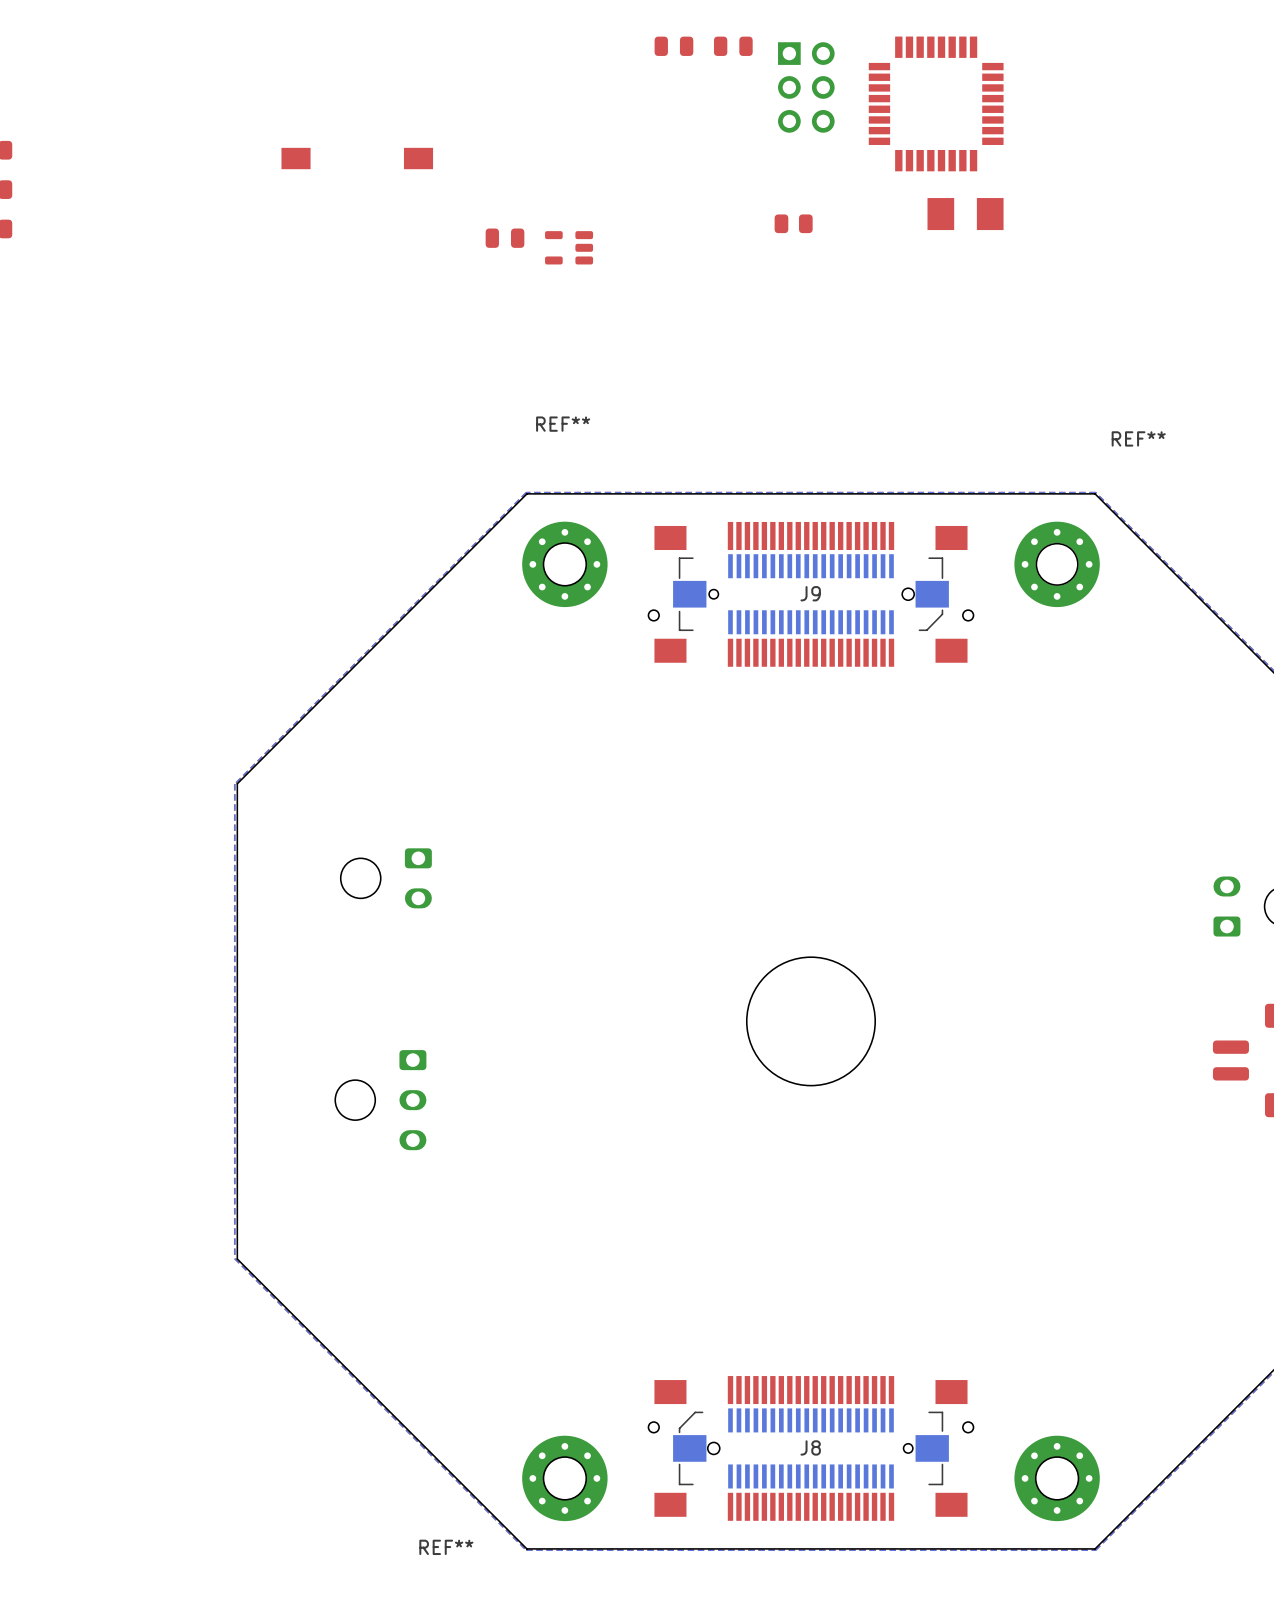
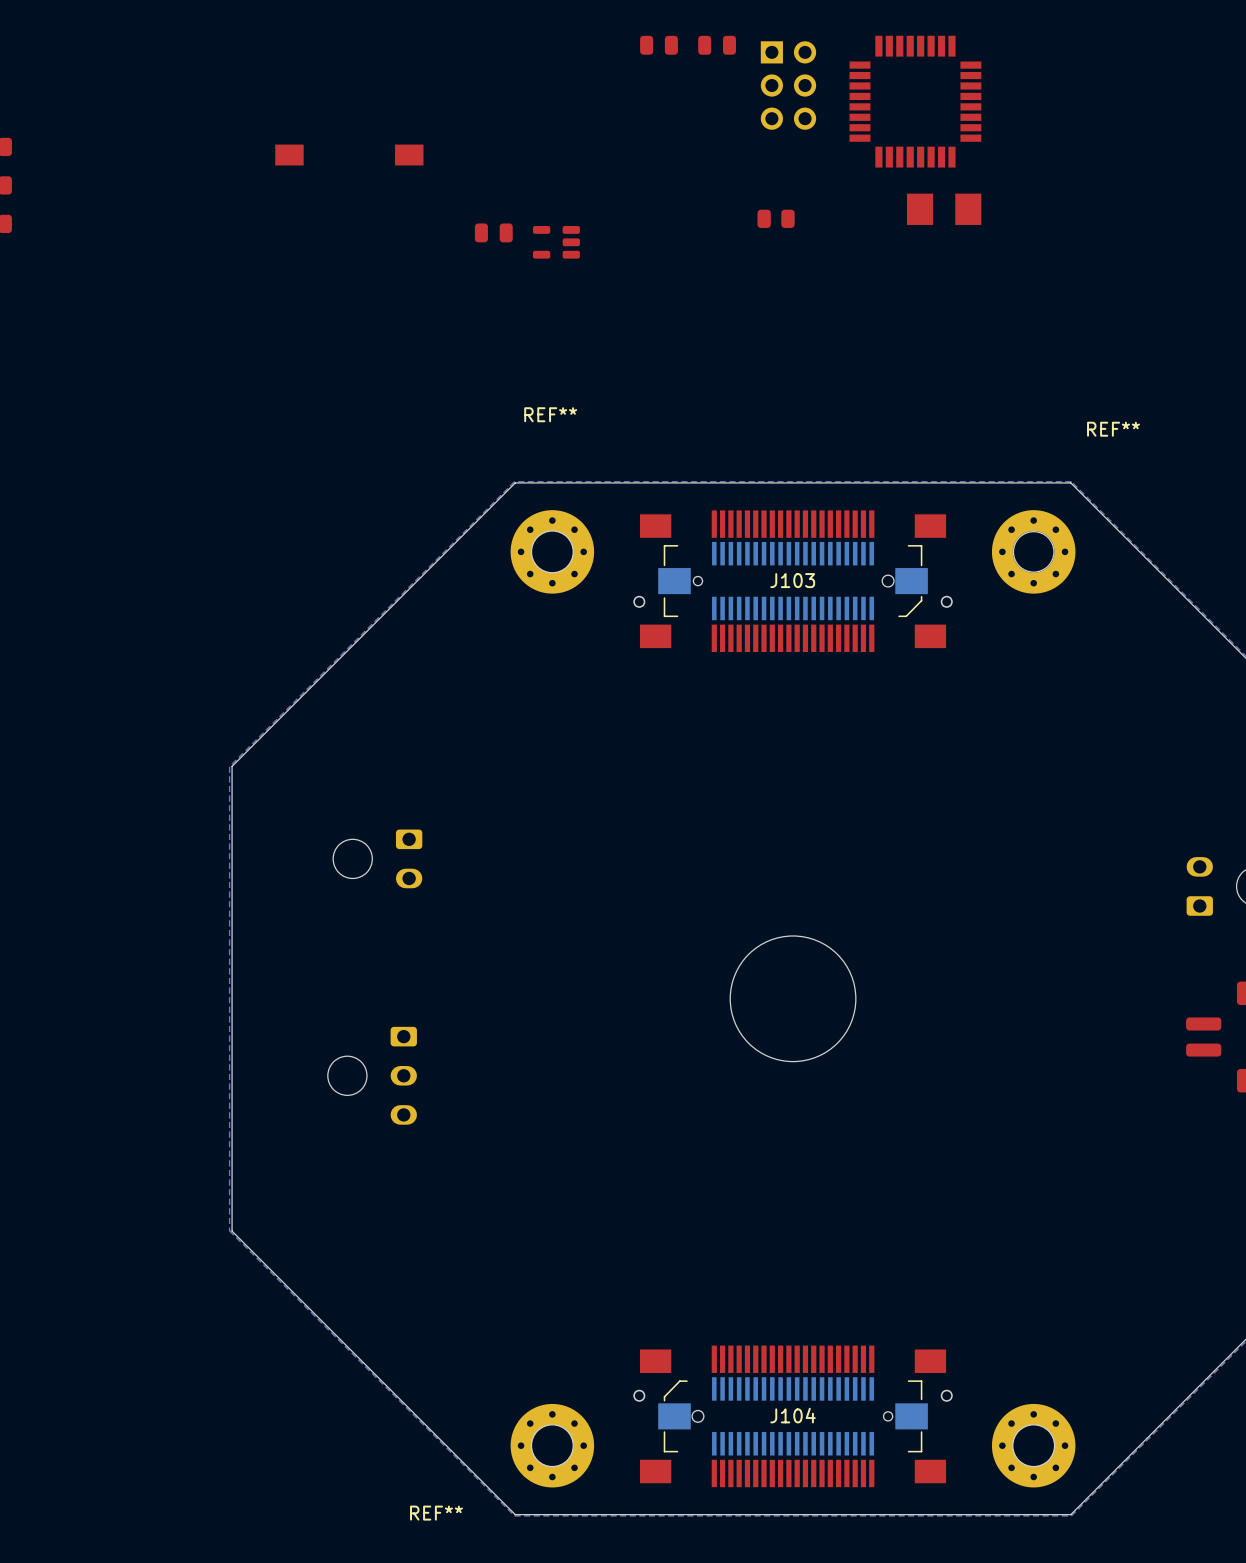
J9 name: J9 (810, 593) -> J103 (792, 580)
J8 name: J8 (810, 1447) -> J104 (793, 1415)

